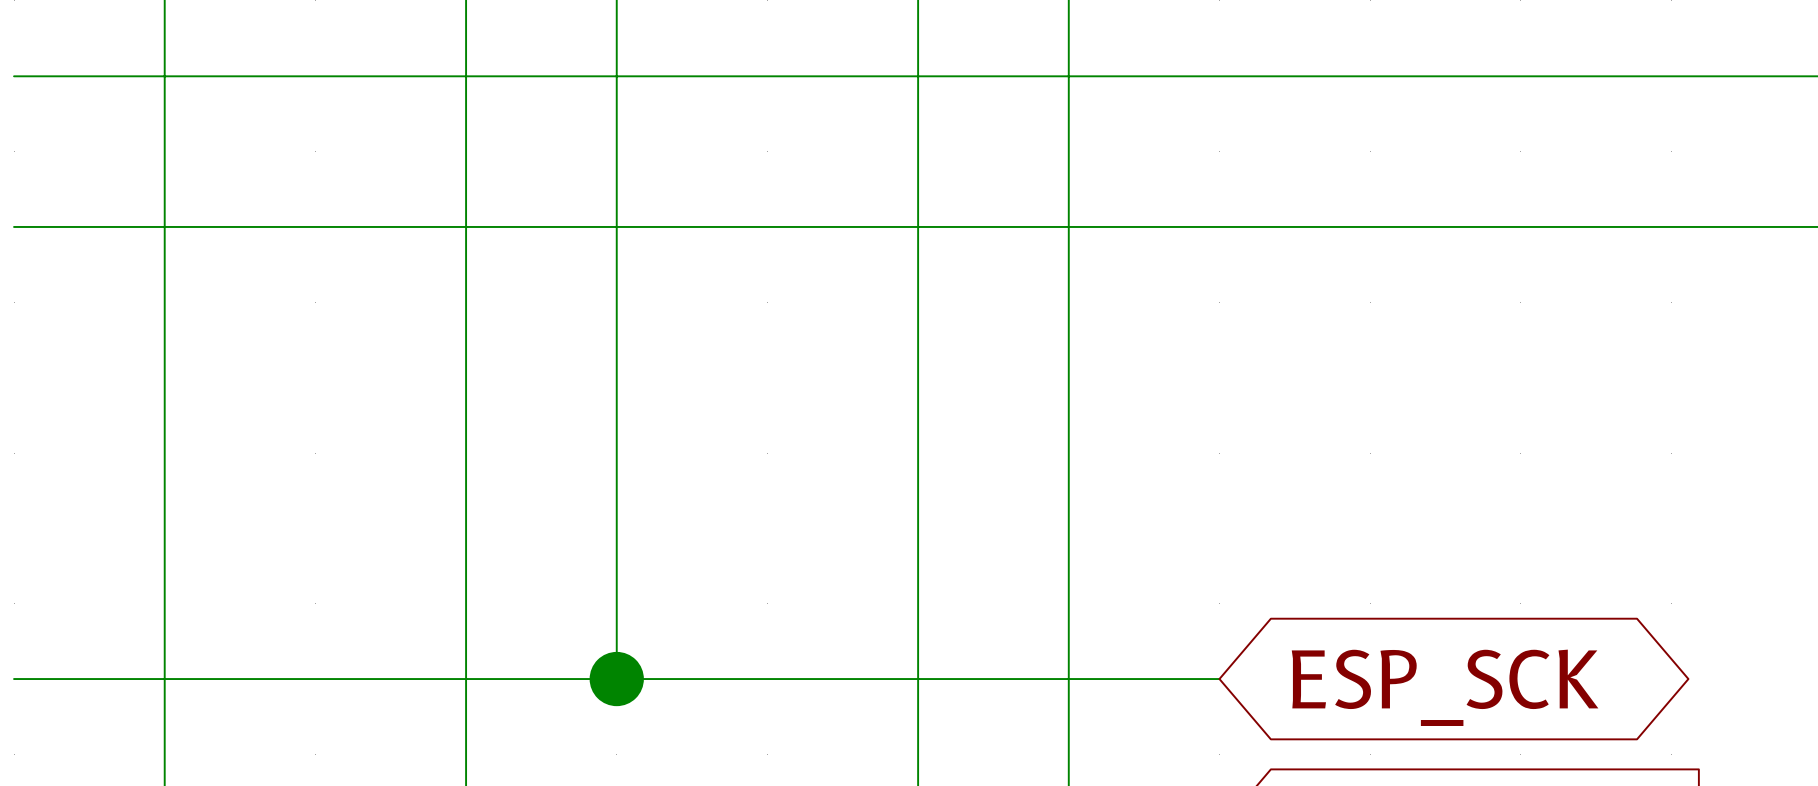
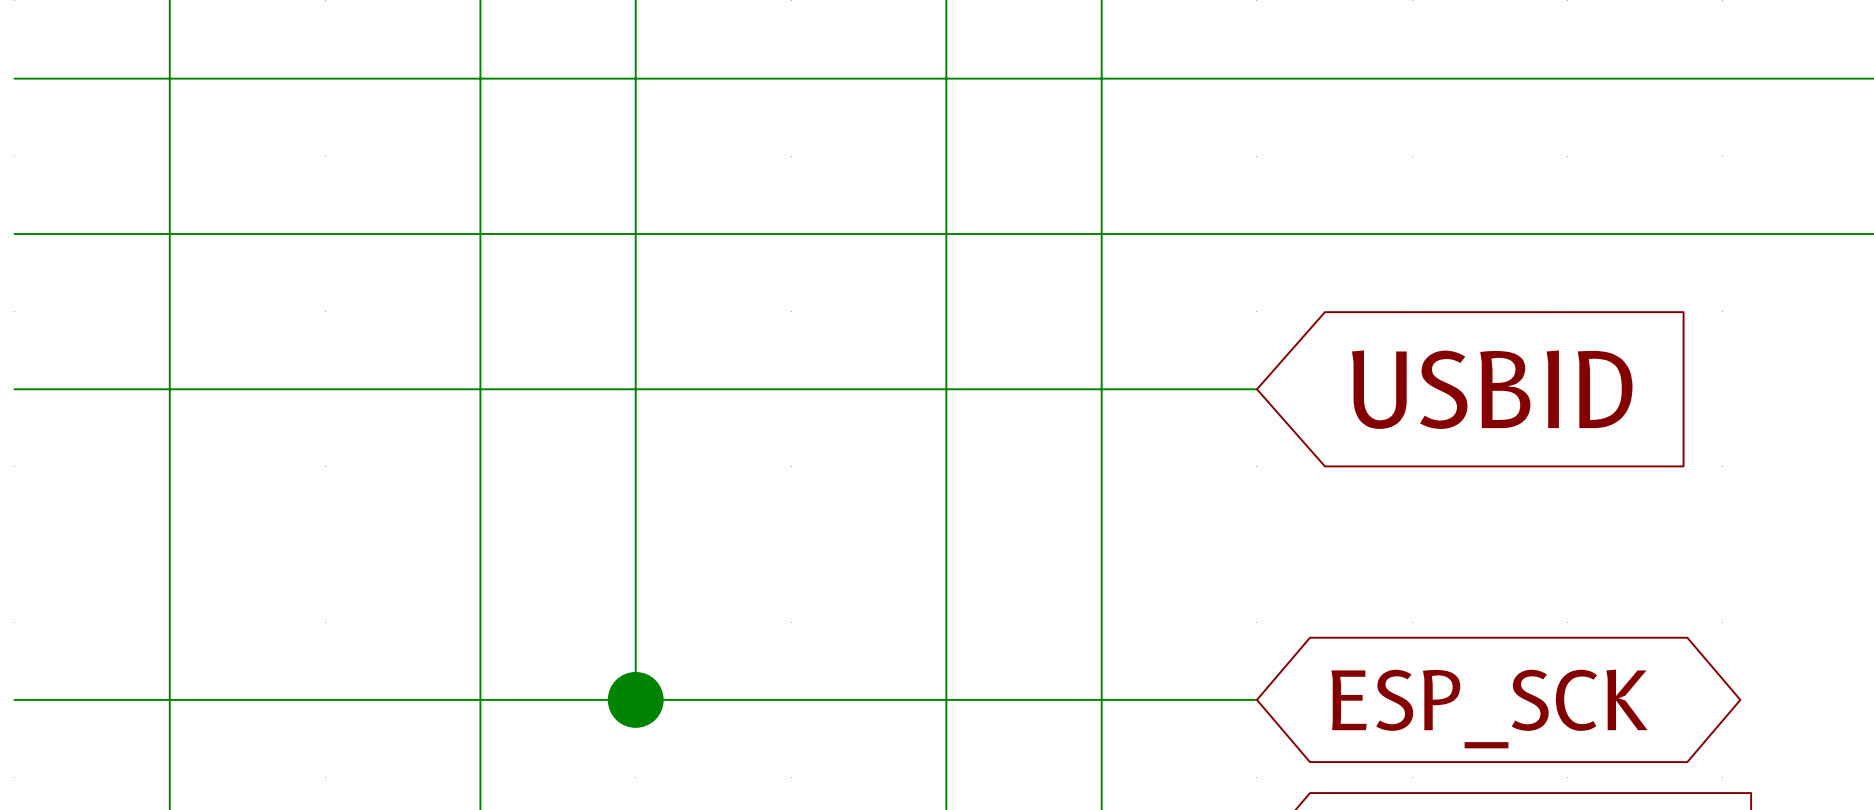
wire: none -> (14, 389) (1256, 389)
global label: none -> USBID (1492, 389)

